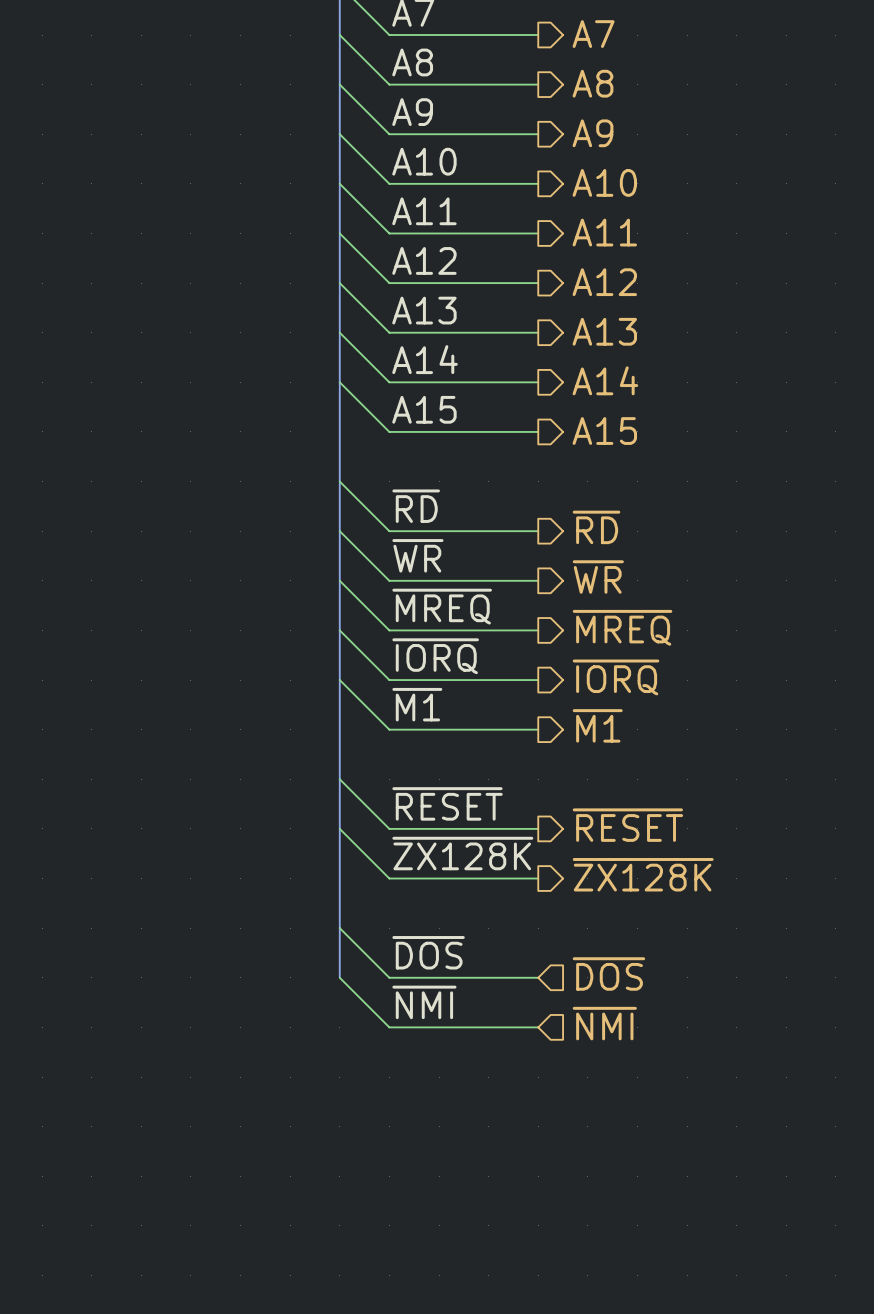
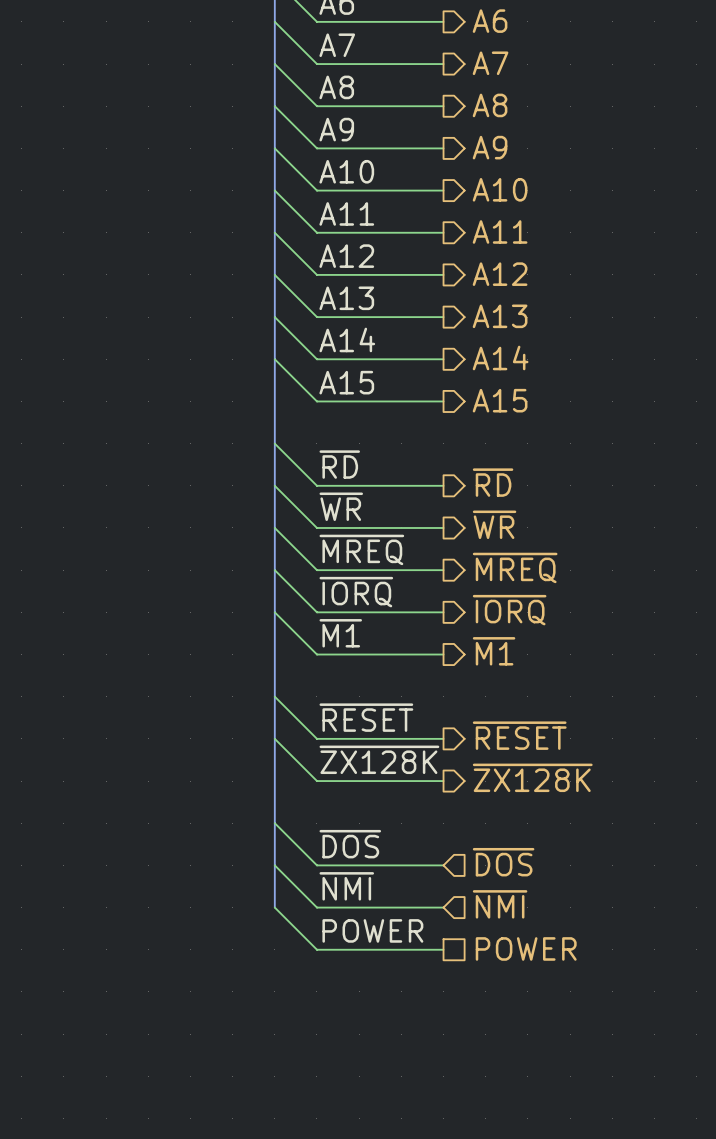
bus: none -> (274, 865) (274, 907)
wire: none -> (274, 907) (316, 949) (443, 949)
label: none -> POWER (372, 930)
hierarchical label: none -> POWER (526, 948)

